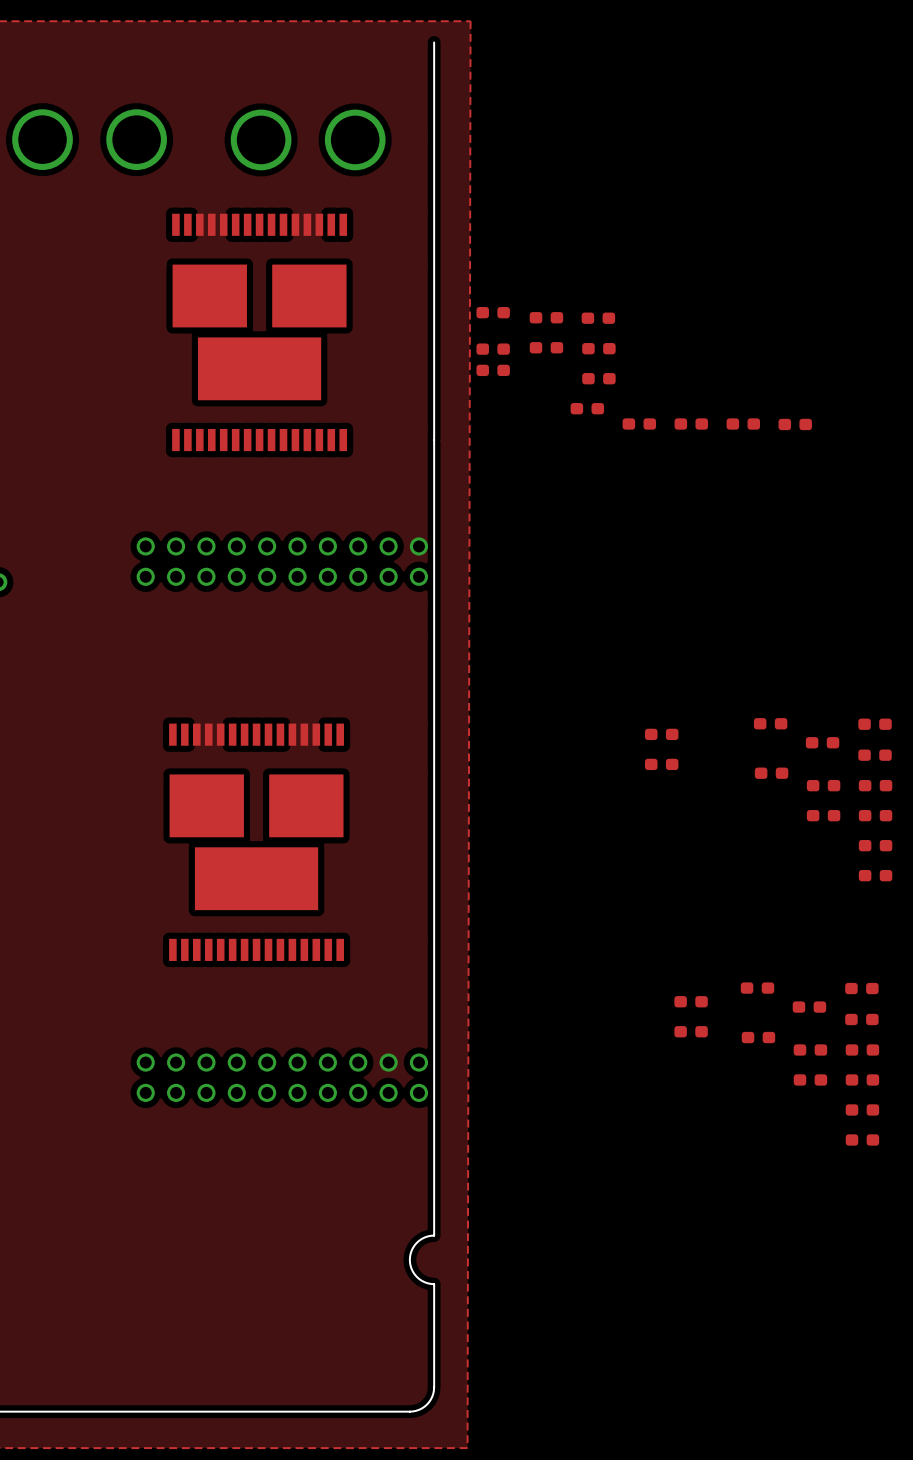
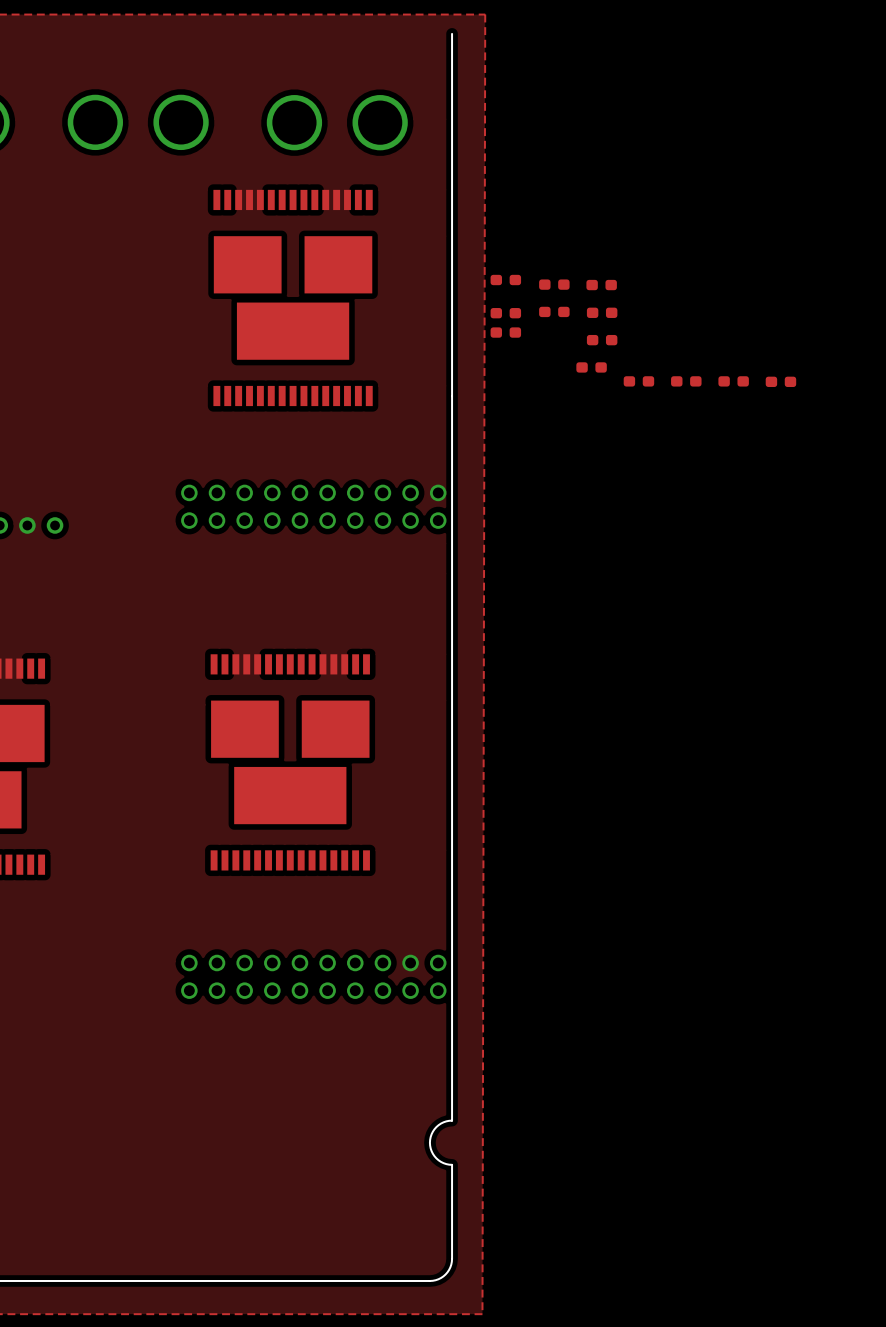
part: (770, 723) -> none
part: (875, 724) -> none
part: (661, 734) -> none
part: (822, 742) -> none
part: (875, 755) -> none
part: (661, 764) -> none
part: (771, 773) -> none
part: (823, 785) -> none
part: (875, 785) -> none
part: (823, 815) -> none
part: (875, 815) -> none
part: (875, 845) -> none
part: (875, 875) -> none
part: (757, 988) -> none
part: (861, 988) -> none
part: (691, 1001) -> none
part: (809, 1007) -> none
part: (861, 1019) -> none
part: (691, 1031) -> none
part: (758, 1037) -> none
part: (810, 1049) -> none
part: (862, 1049) -> none
part: (810, 1079) -> none
part: (862, 1079) -> none
part: (862, 1109) -> none
part: (862, 1139) -> none

